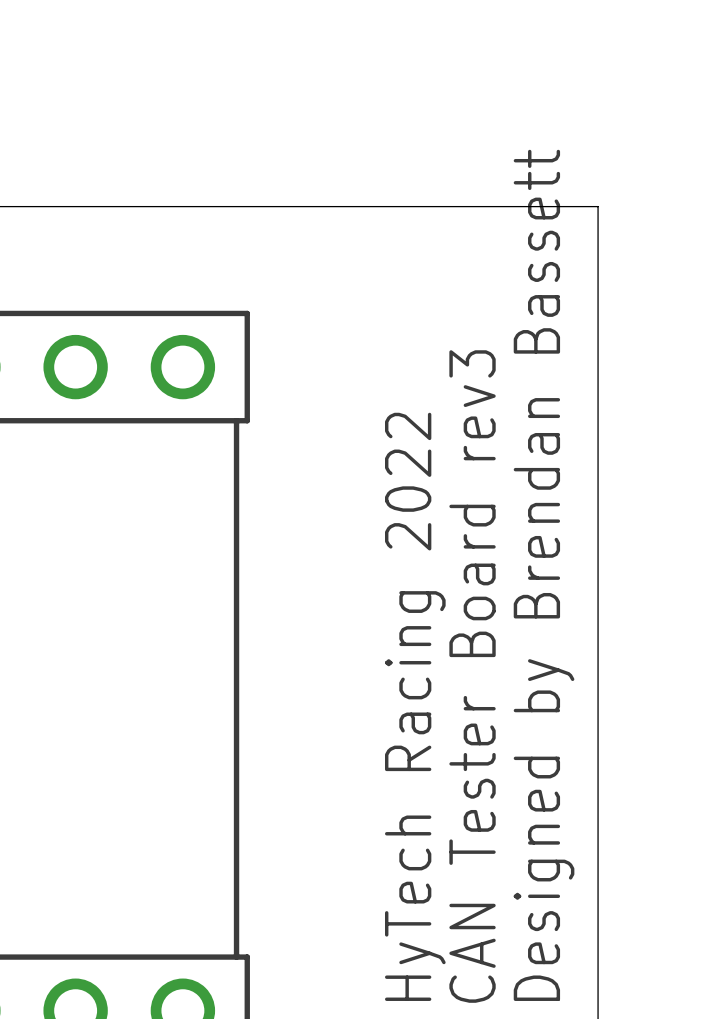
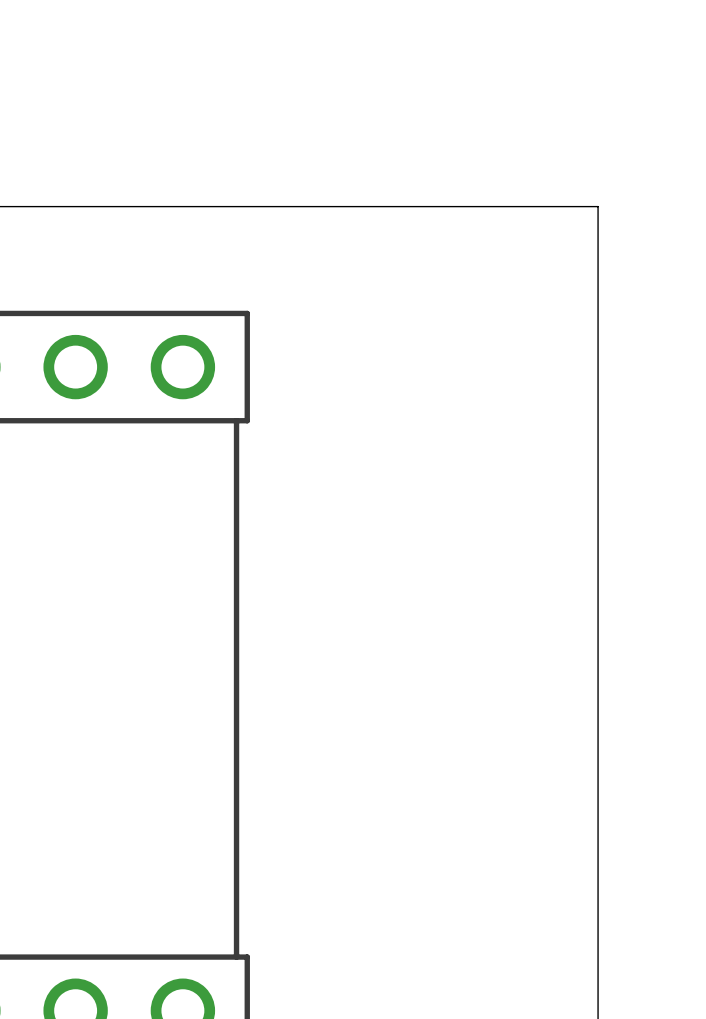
text: Designed by Brendan Bassett (544, 575) -> none
text: CAN Tester Board rev3 (472, 676) -> none
text: HyTech Racing 2022 (415, 706) -> none

